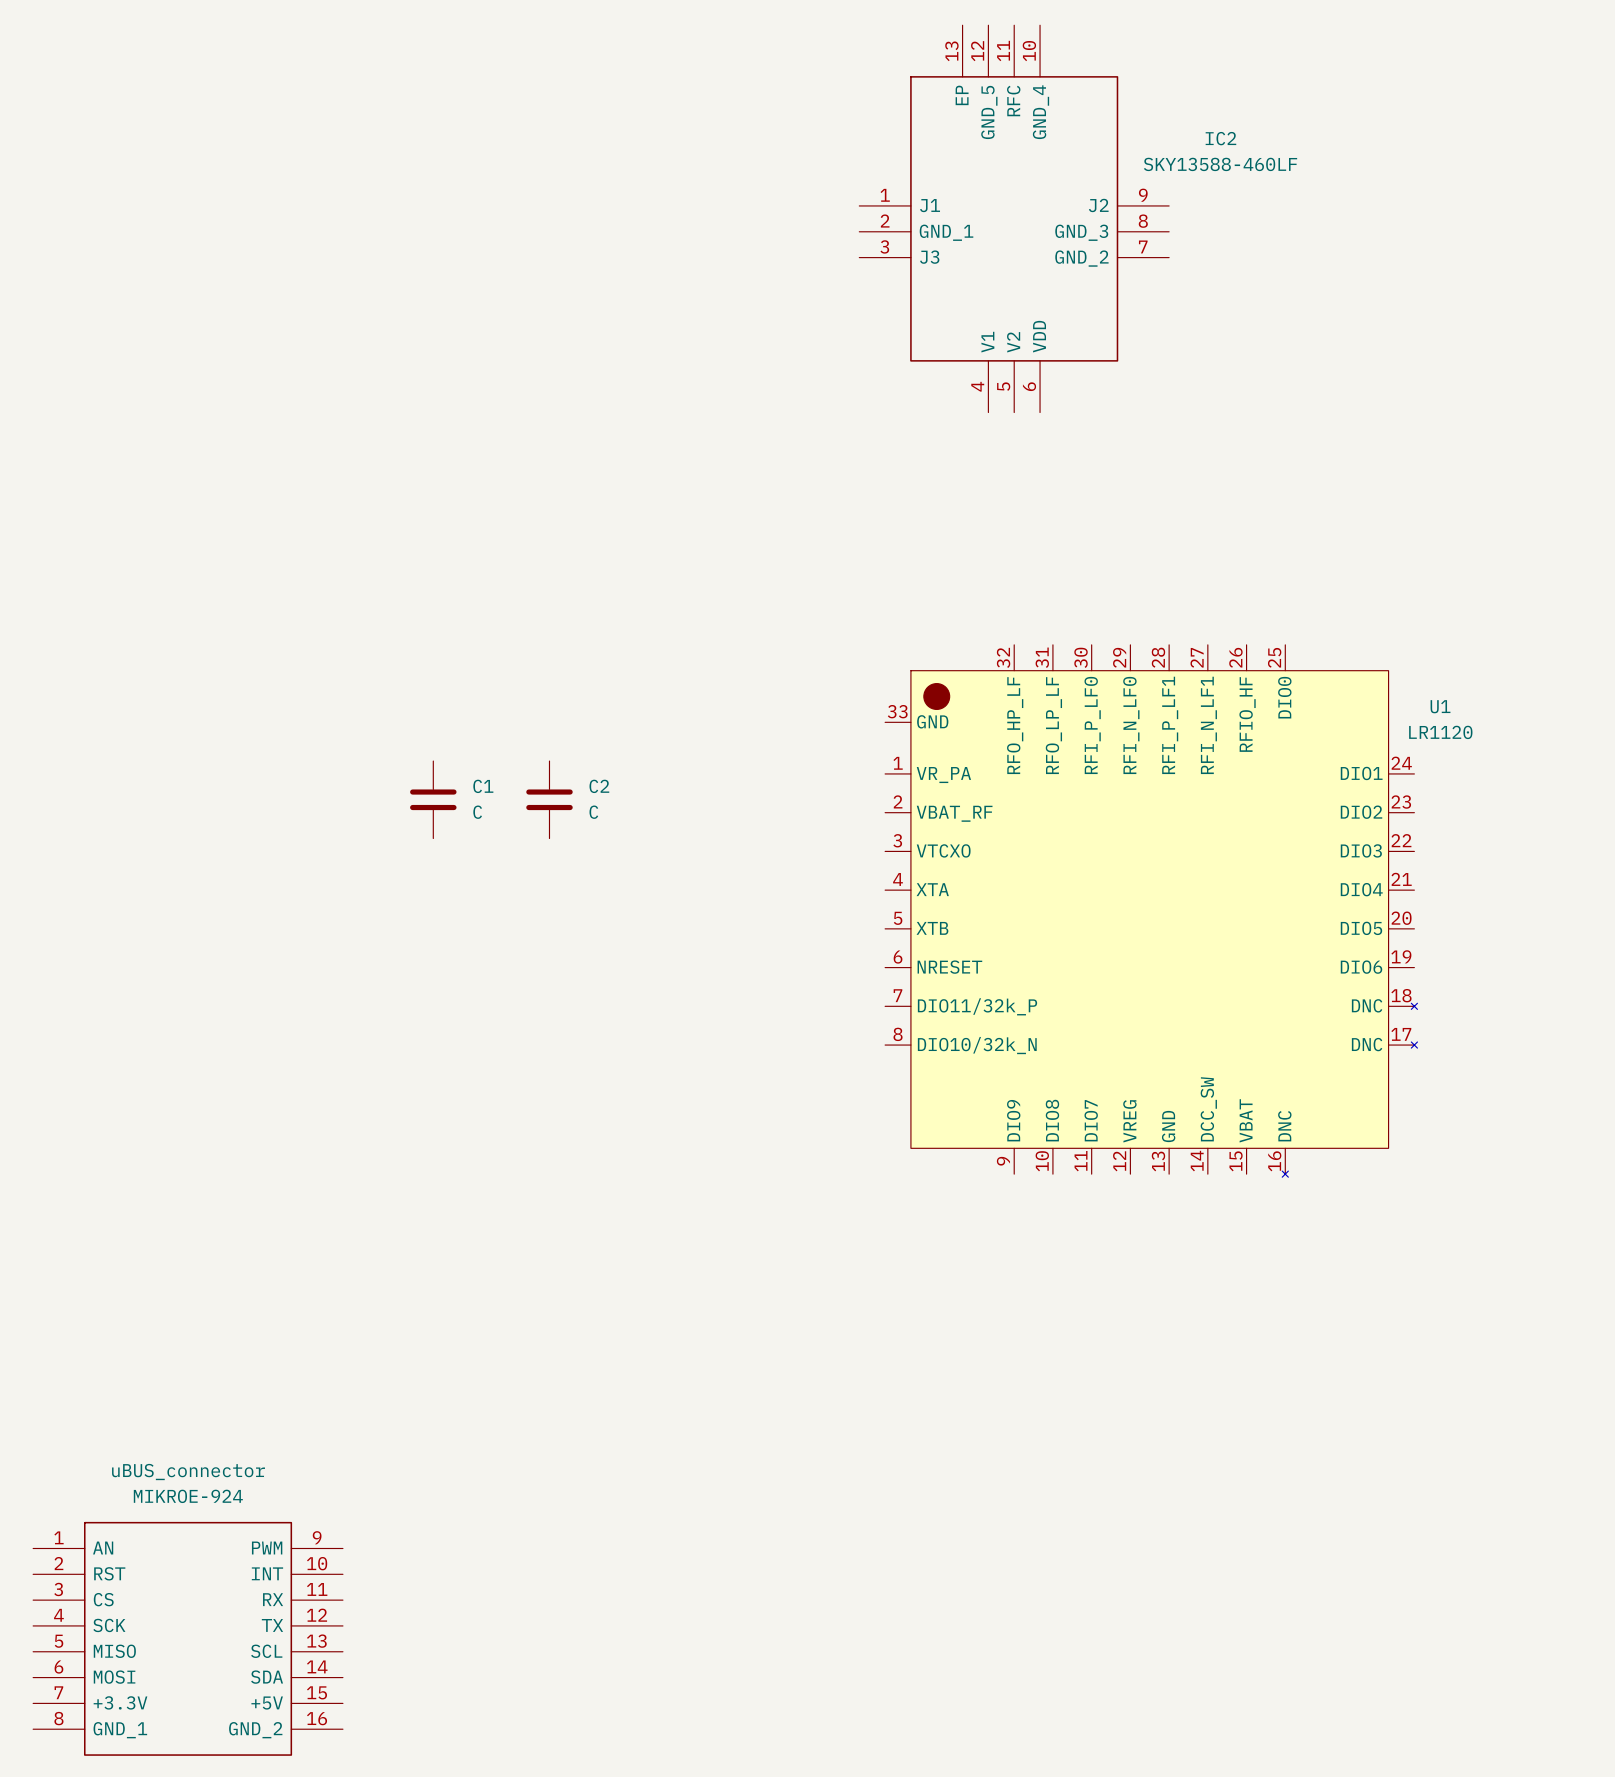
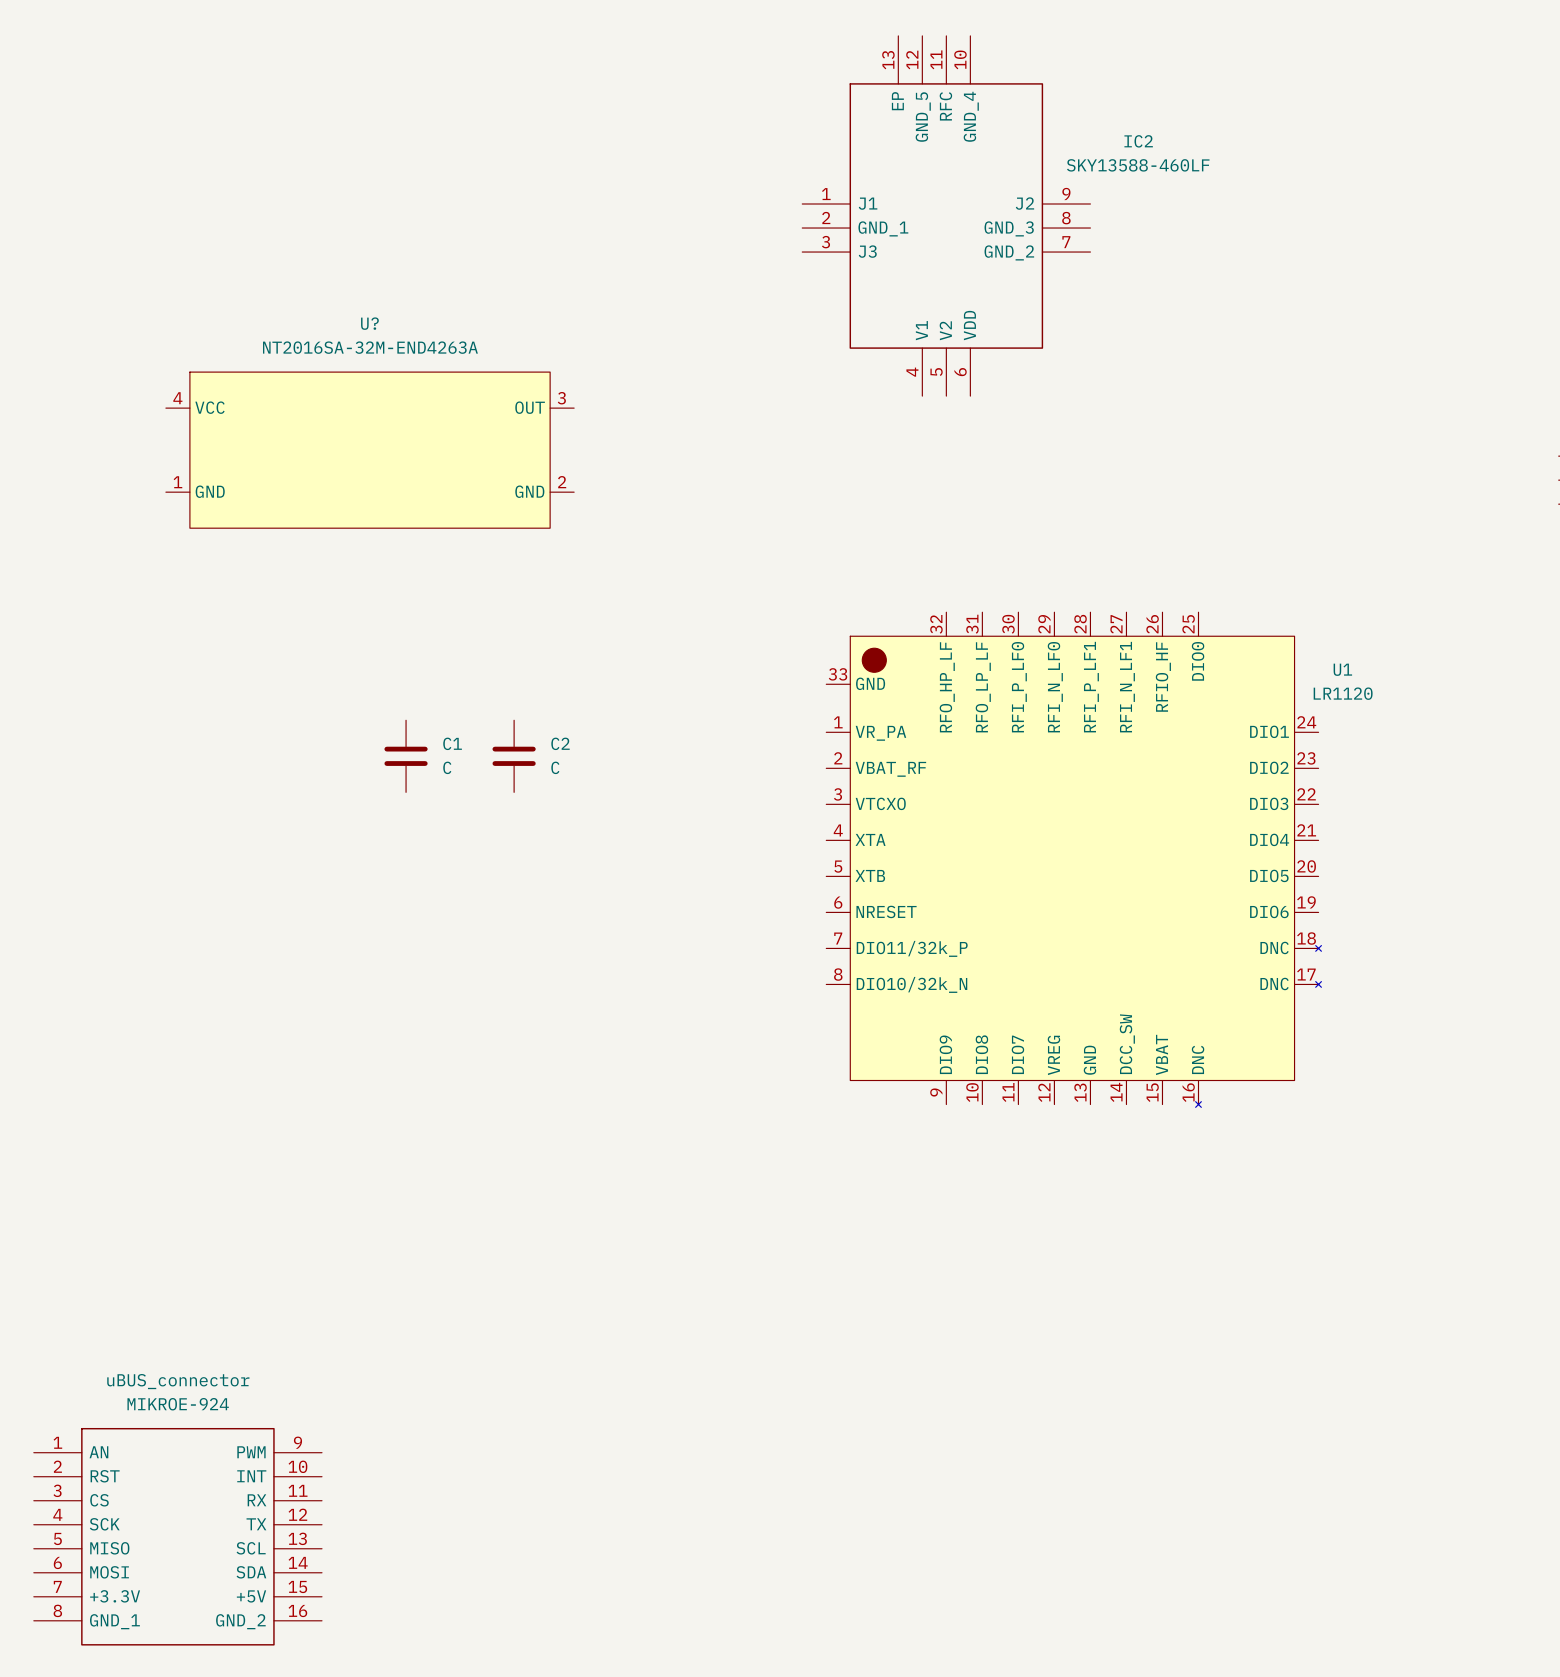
U?: none -> NT2016SA-32M-END4263A (370, 450)

